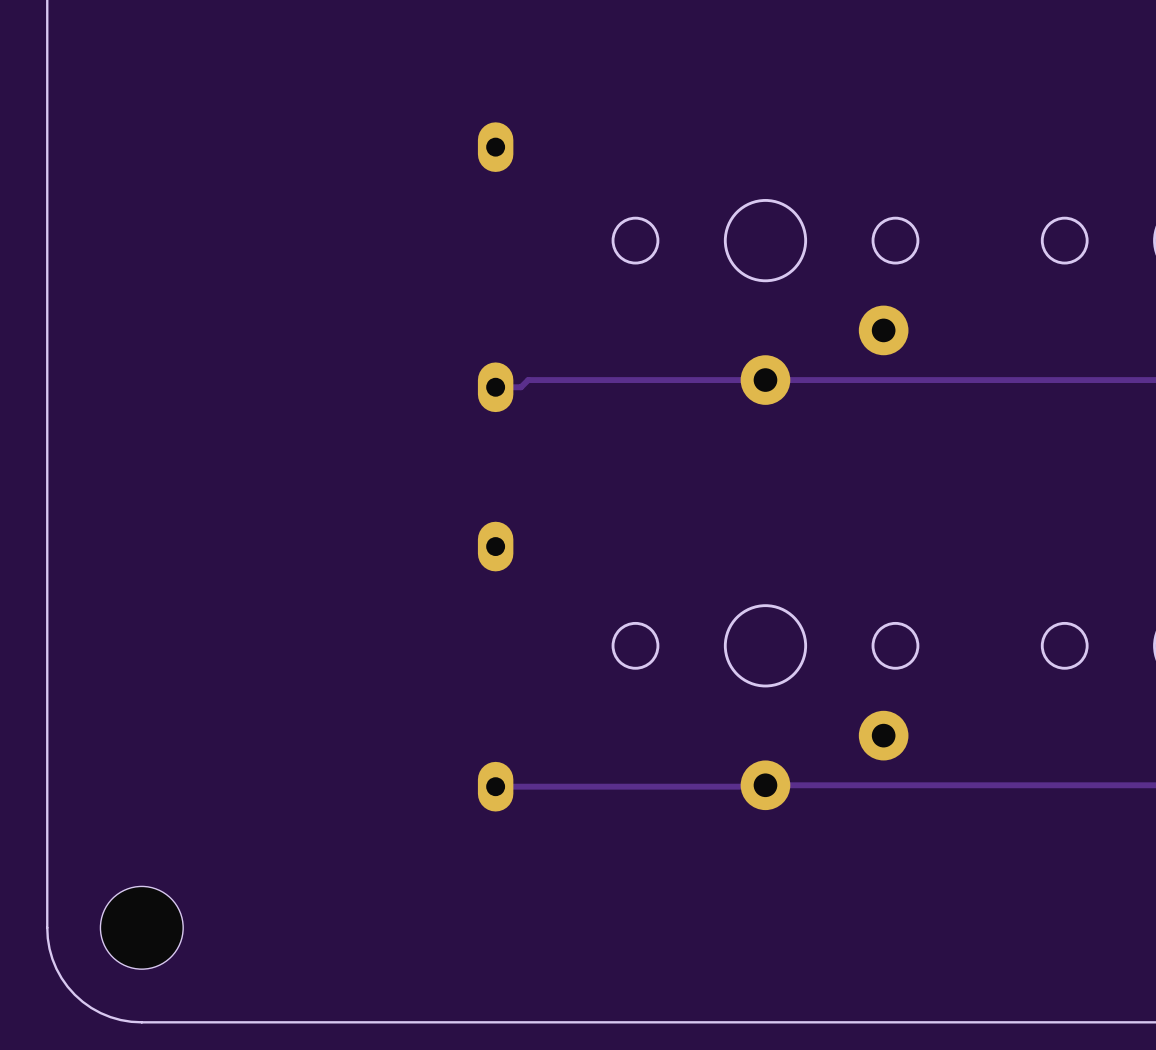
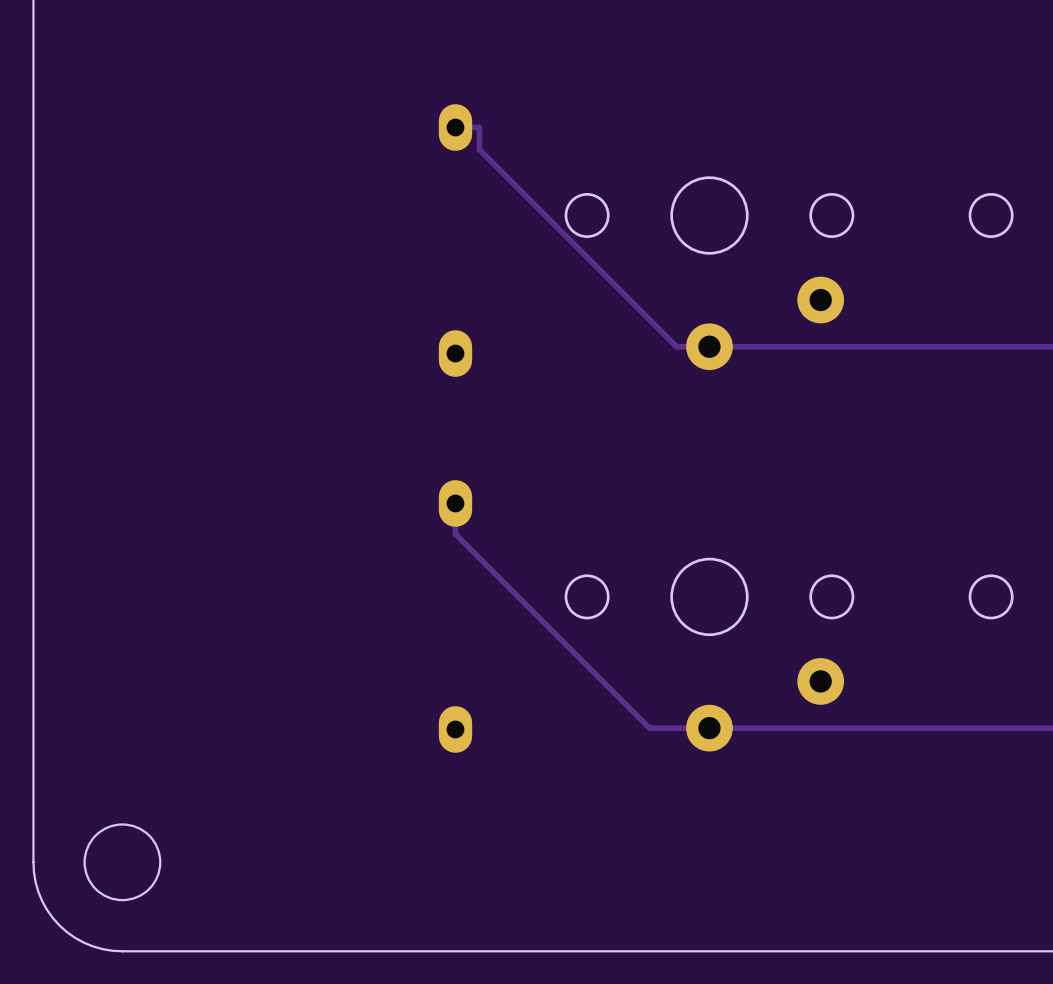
track: (730, 380) (528, 380) (521, 387) (495, 387) -> (676, 346) (479, 149) (479, 127) (455, 127)
track: (765, 785) (495, 786) -> (709, 728) (649, 728) (455, 534) (455, 503)
round board edge: none -> [83, 823, 162, 902]
part: (141, 927) -> none

